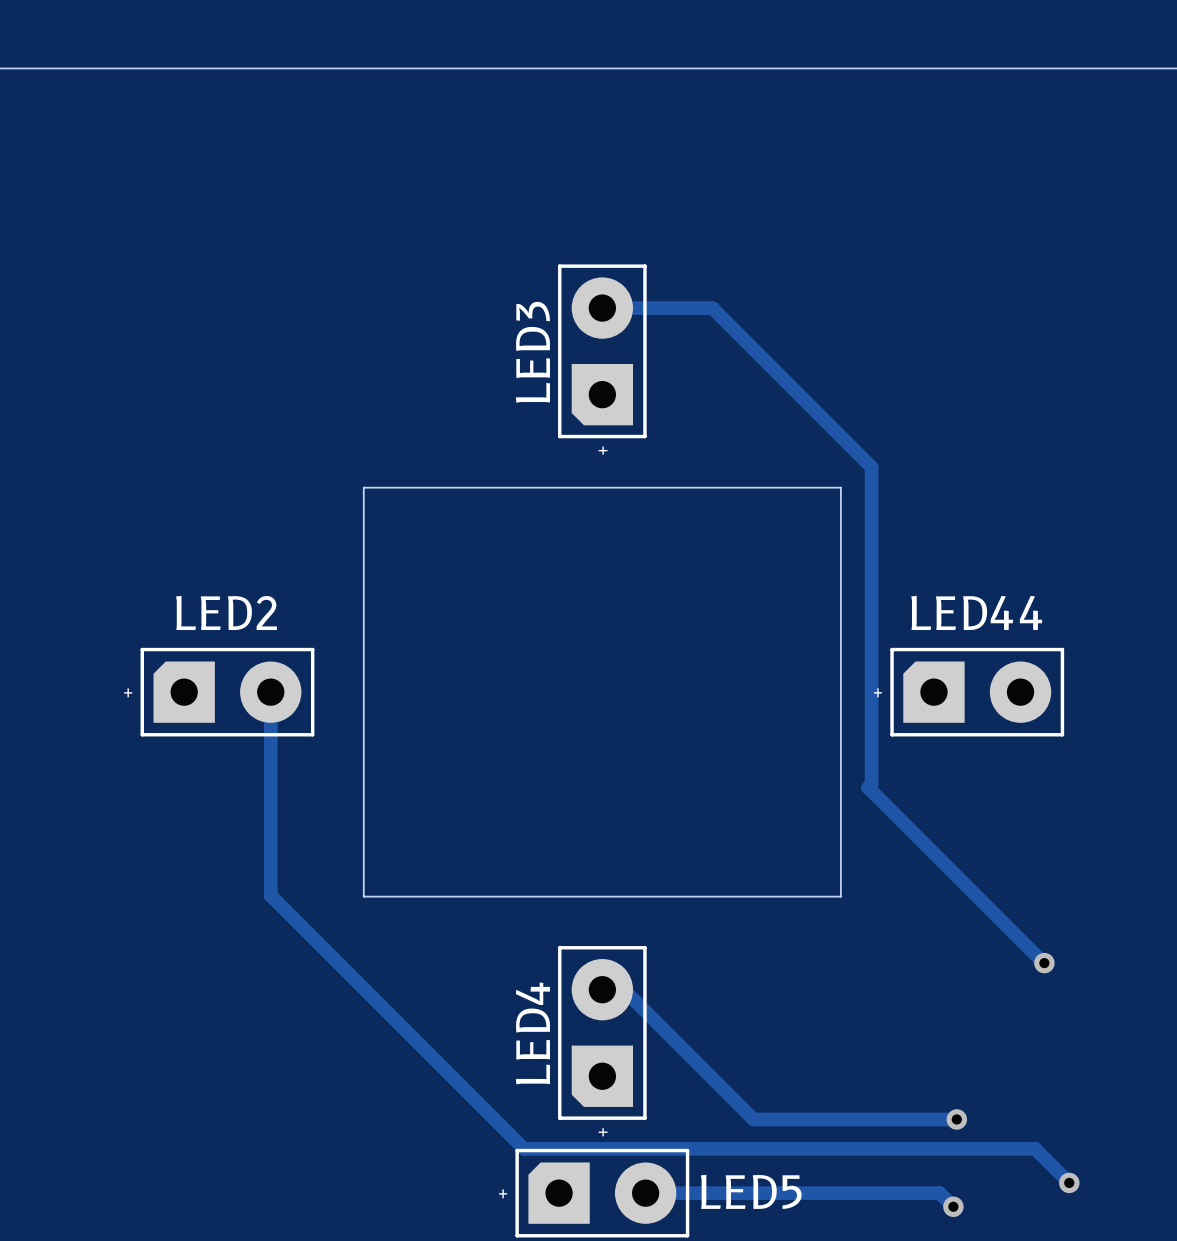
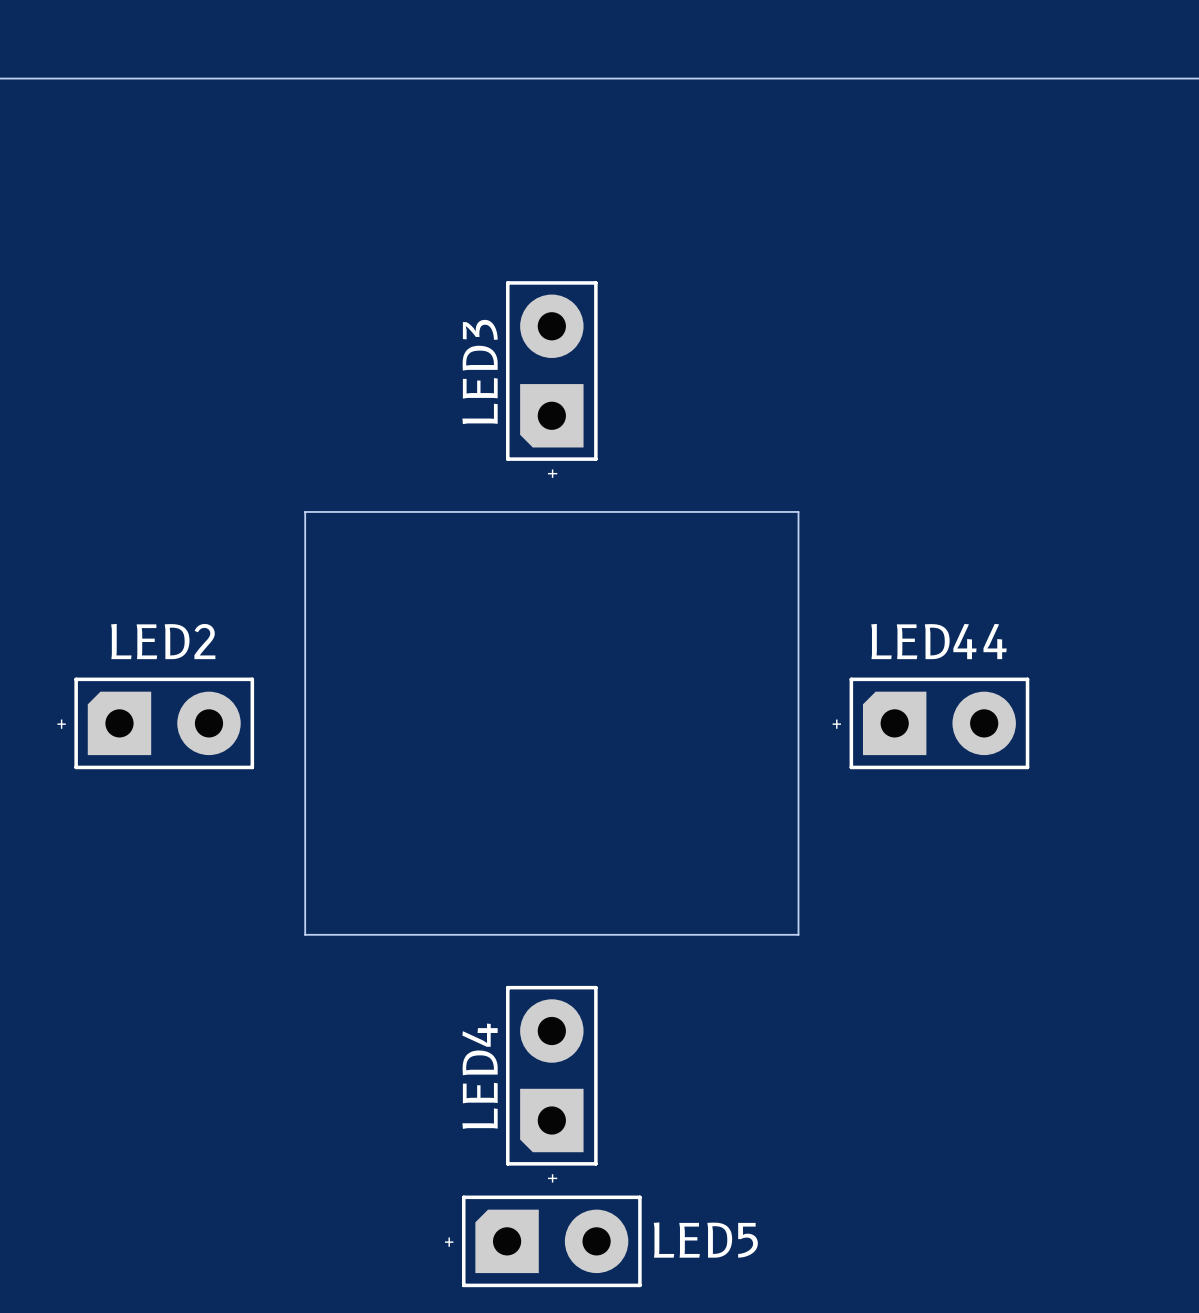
track: (602, 308) (712, 308) (871, 467) (871, 784) (868, 787) (1043, 963) -> none
track: (270, 692) (270, 895) (523, 1148) (1035, 1148) (1069, 1182) -> none
via: (1044, 963) -> none
track: (602, 989) (623, 989) (753, 1119) (956, 1119) -> none
via: (956, 1119) -> none
via: (1069, 1182) -> none
track: (645, 1193) (939, 1193) (953, 1206) -> none
via: (953, 1206) -> none

